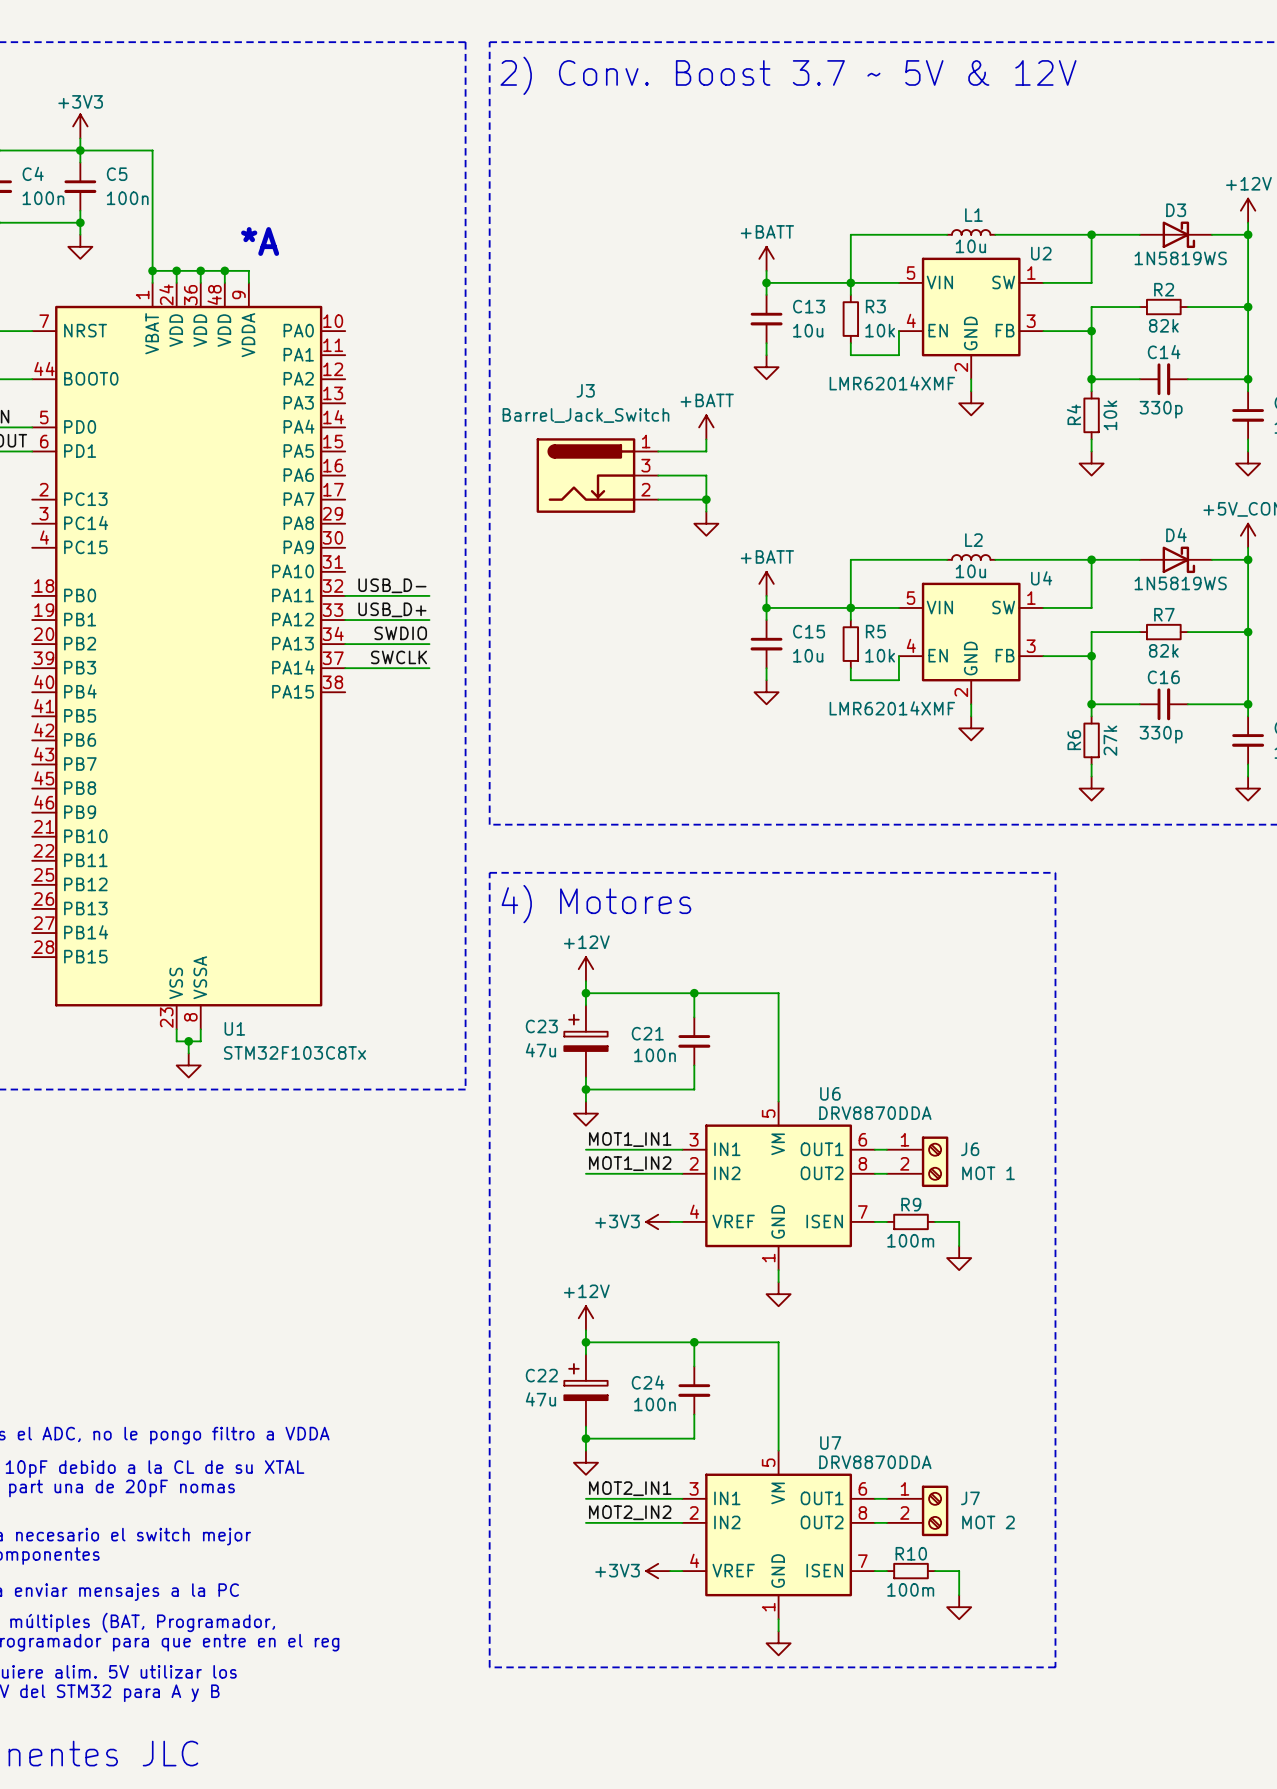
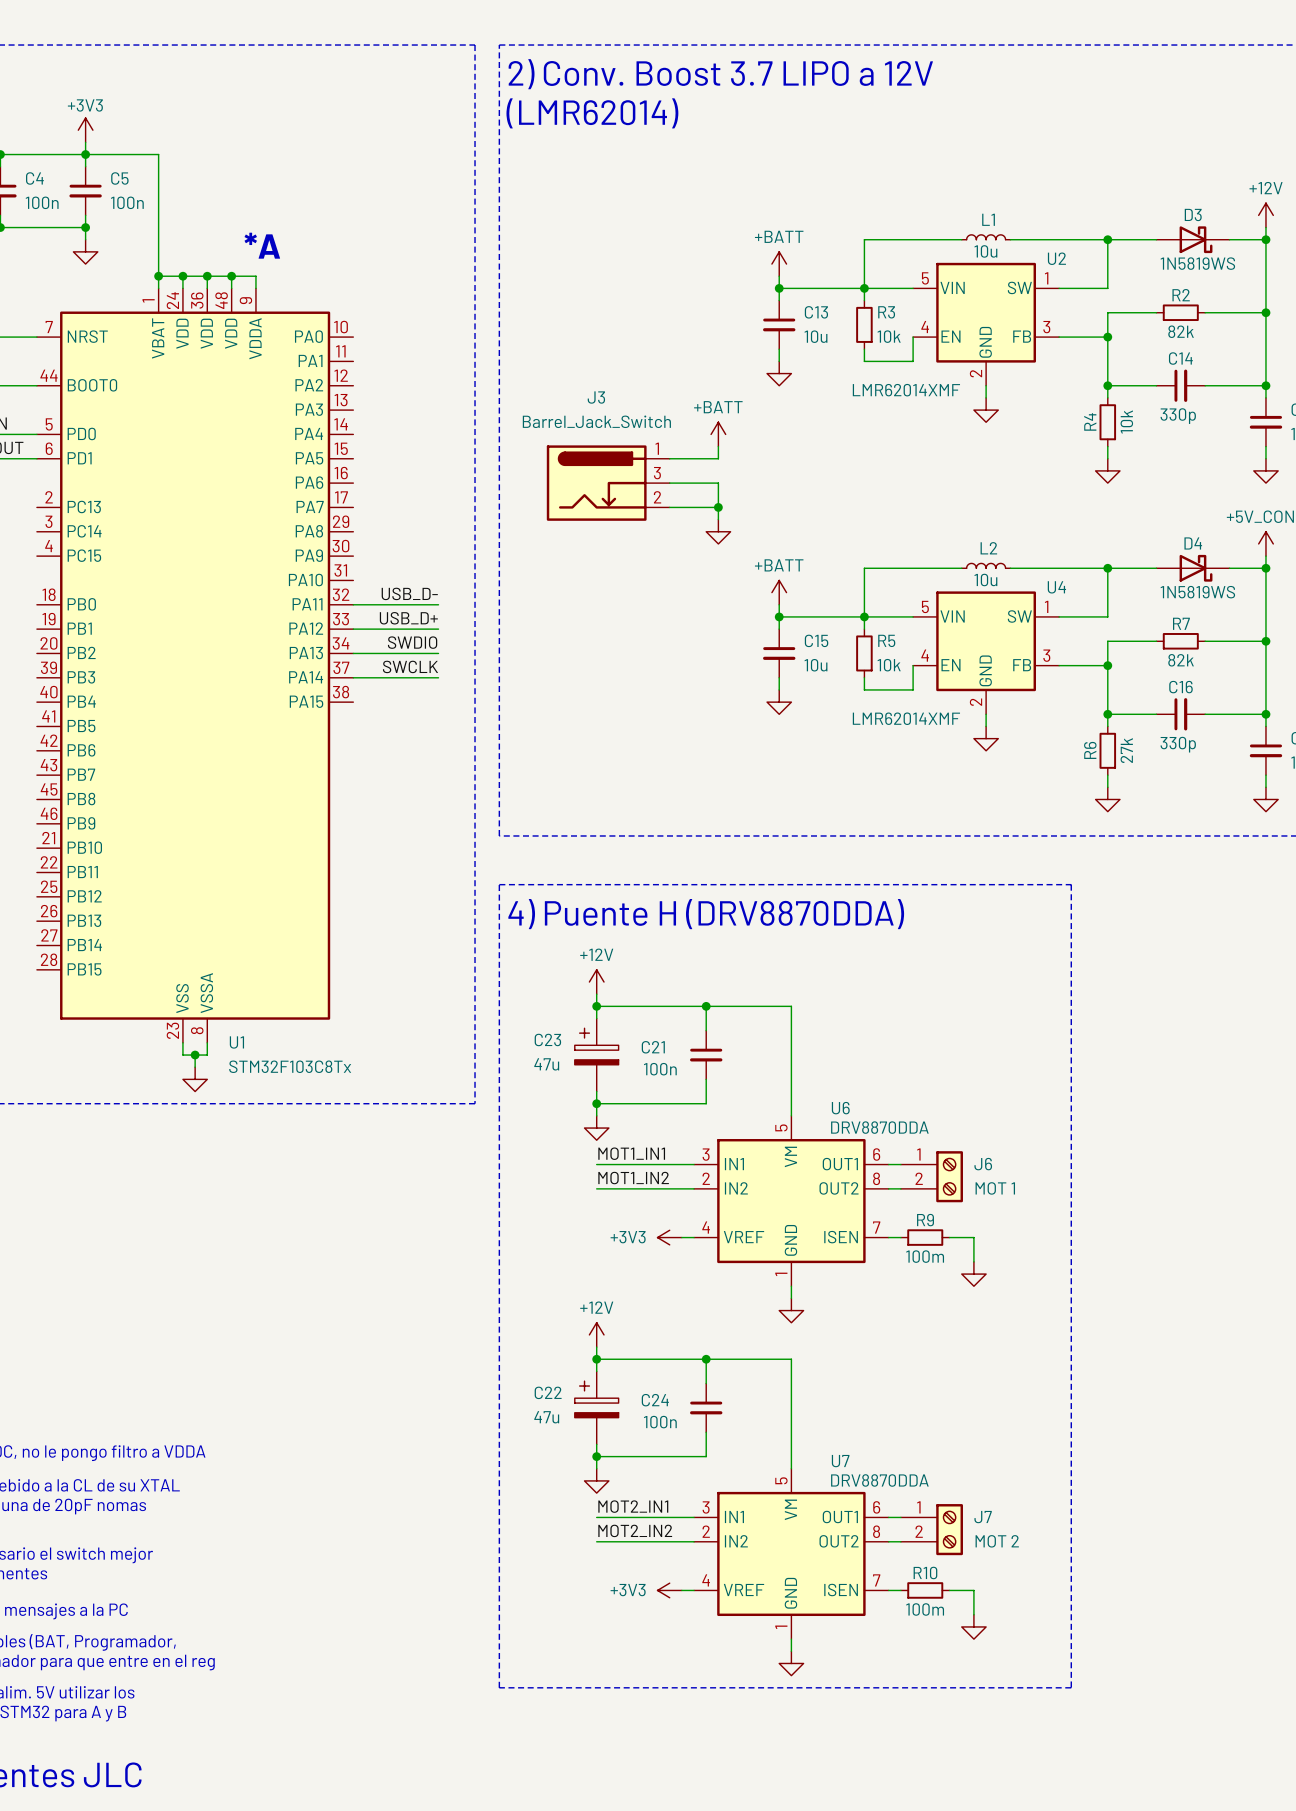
text: 2) Conv. Boost 3.7 ~ 5V & 12V (788, 75) -> 2) Conv. Boost 3.7 LIPO a 12V (720, 74)
text: none -> (LMR62014) (592, 113)
text: 4) Motores (596, 904) -> 4) Puente H (DRV8870DDA) (706, 914)

